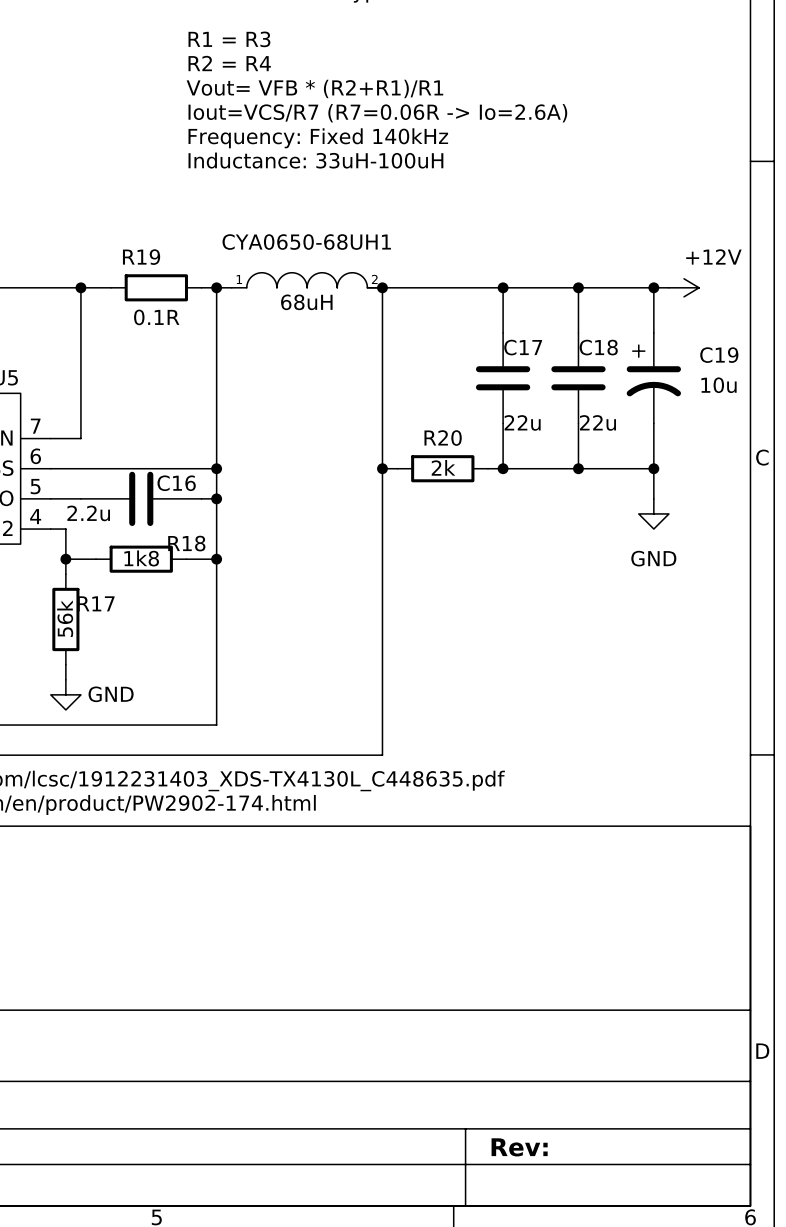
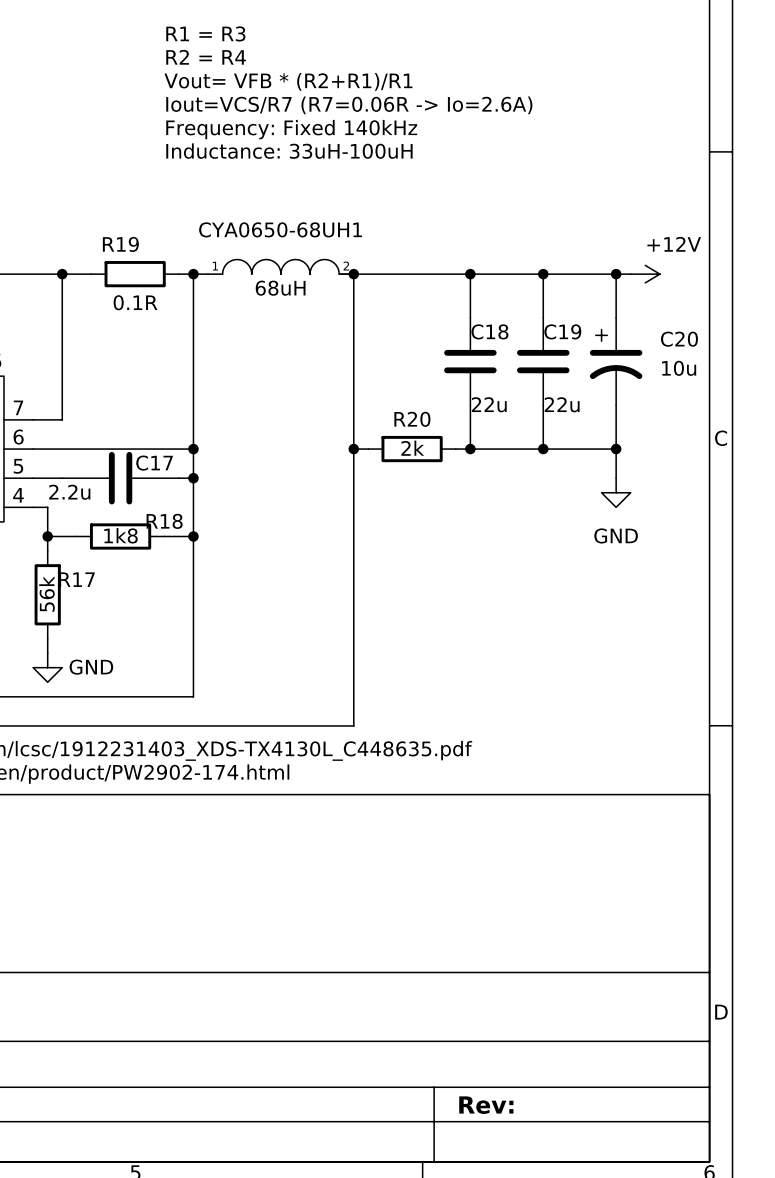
C17 name: C17 (523, 347) -> C18 (489, 331)
C18 name: C18 (598, 347) -> C19 (562, 331)
C19 name: C19 (719, 355) -> C20 (679, 339)
C16 name: C16 (176, 483) -> C17 (154, 463)

